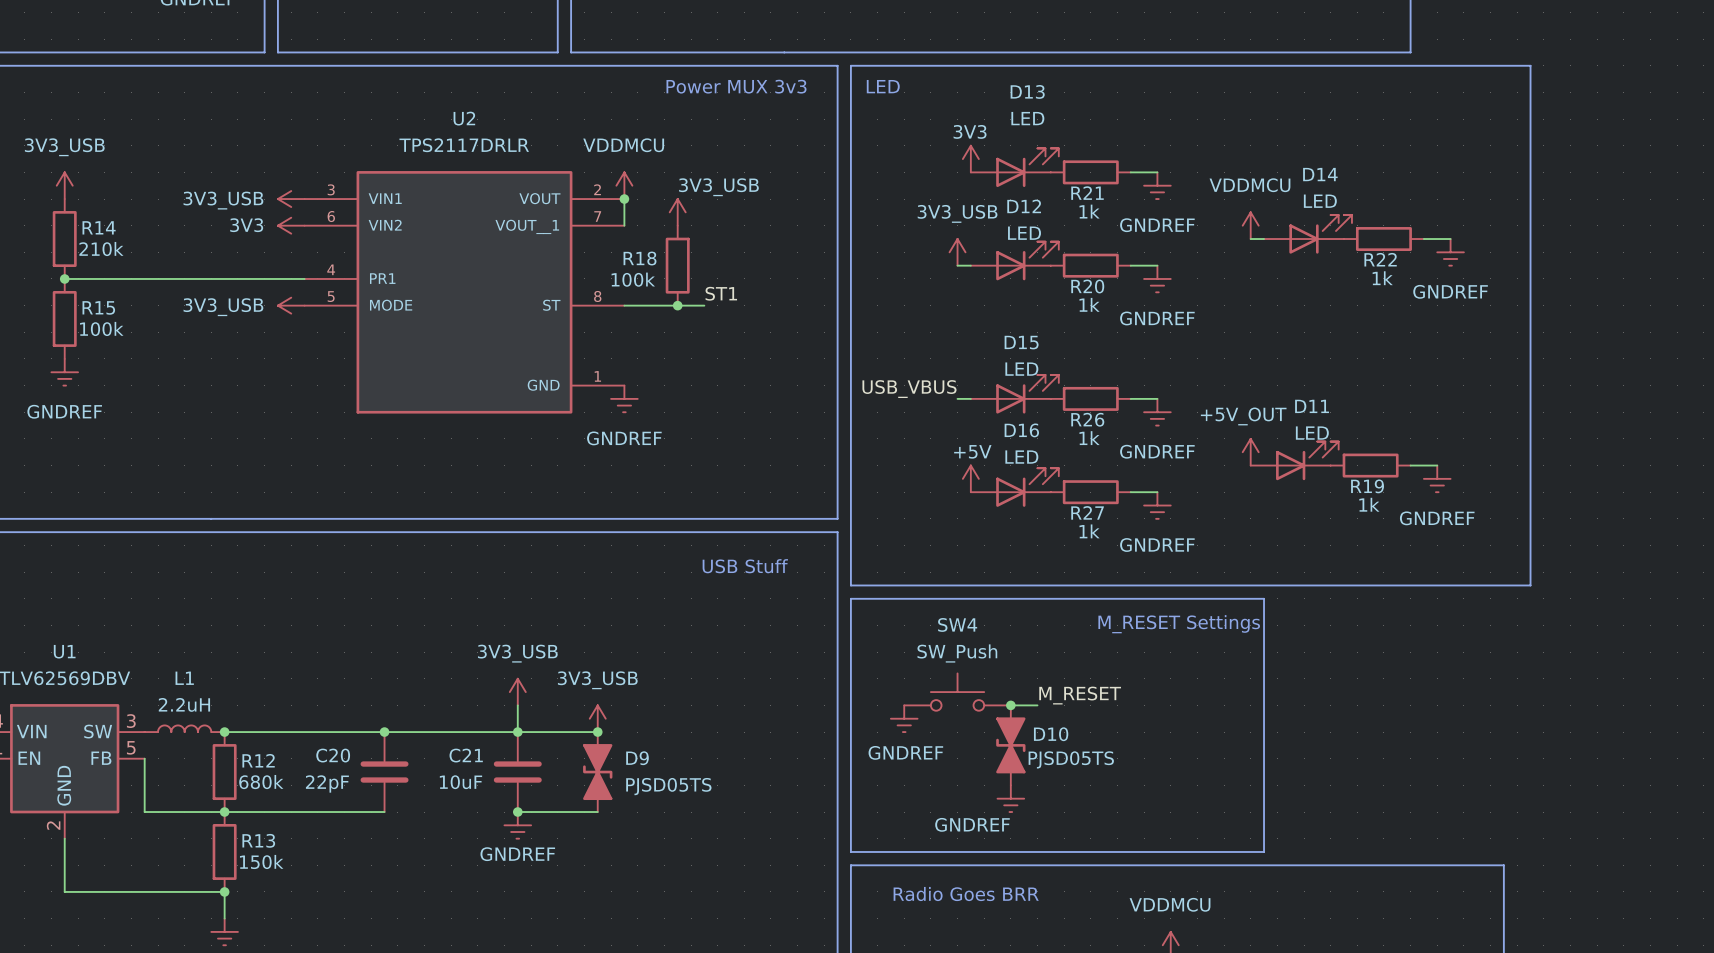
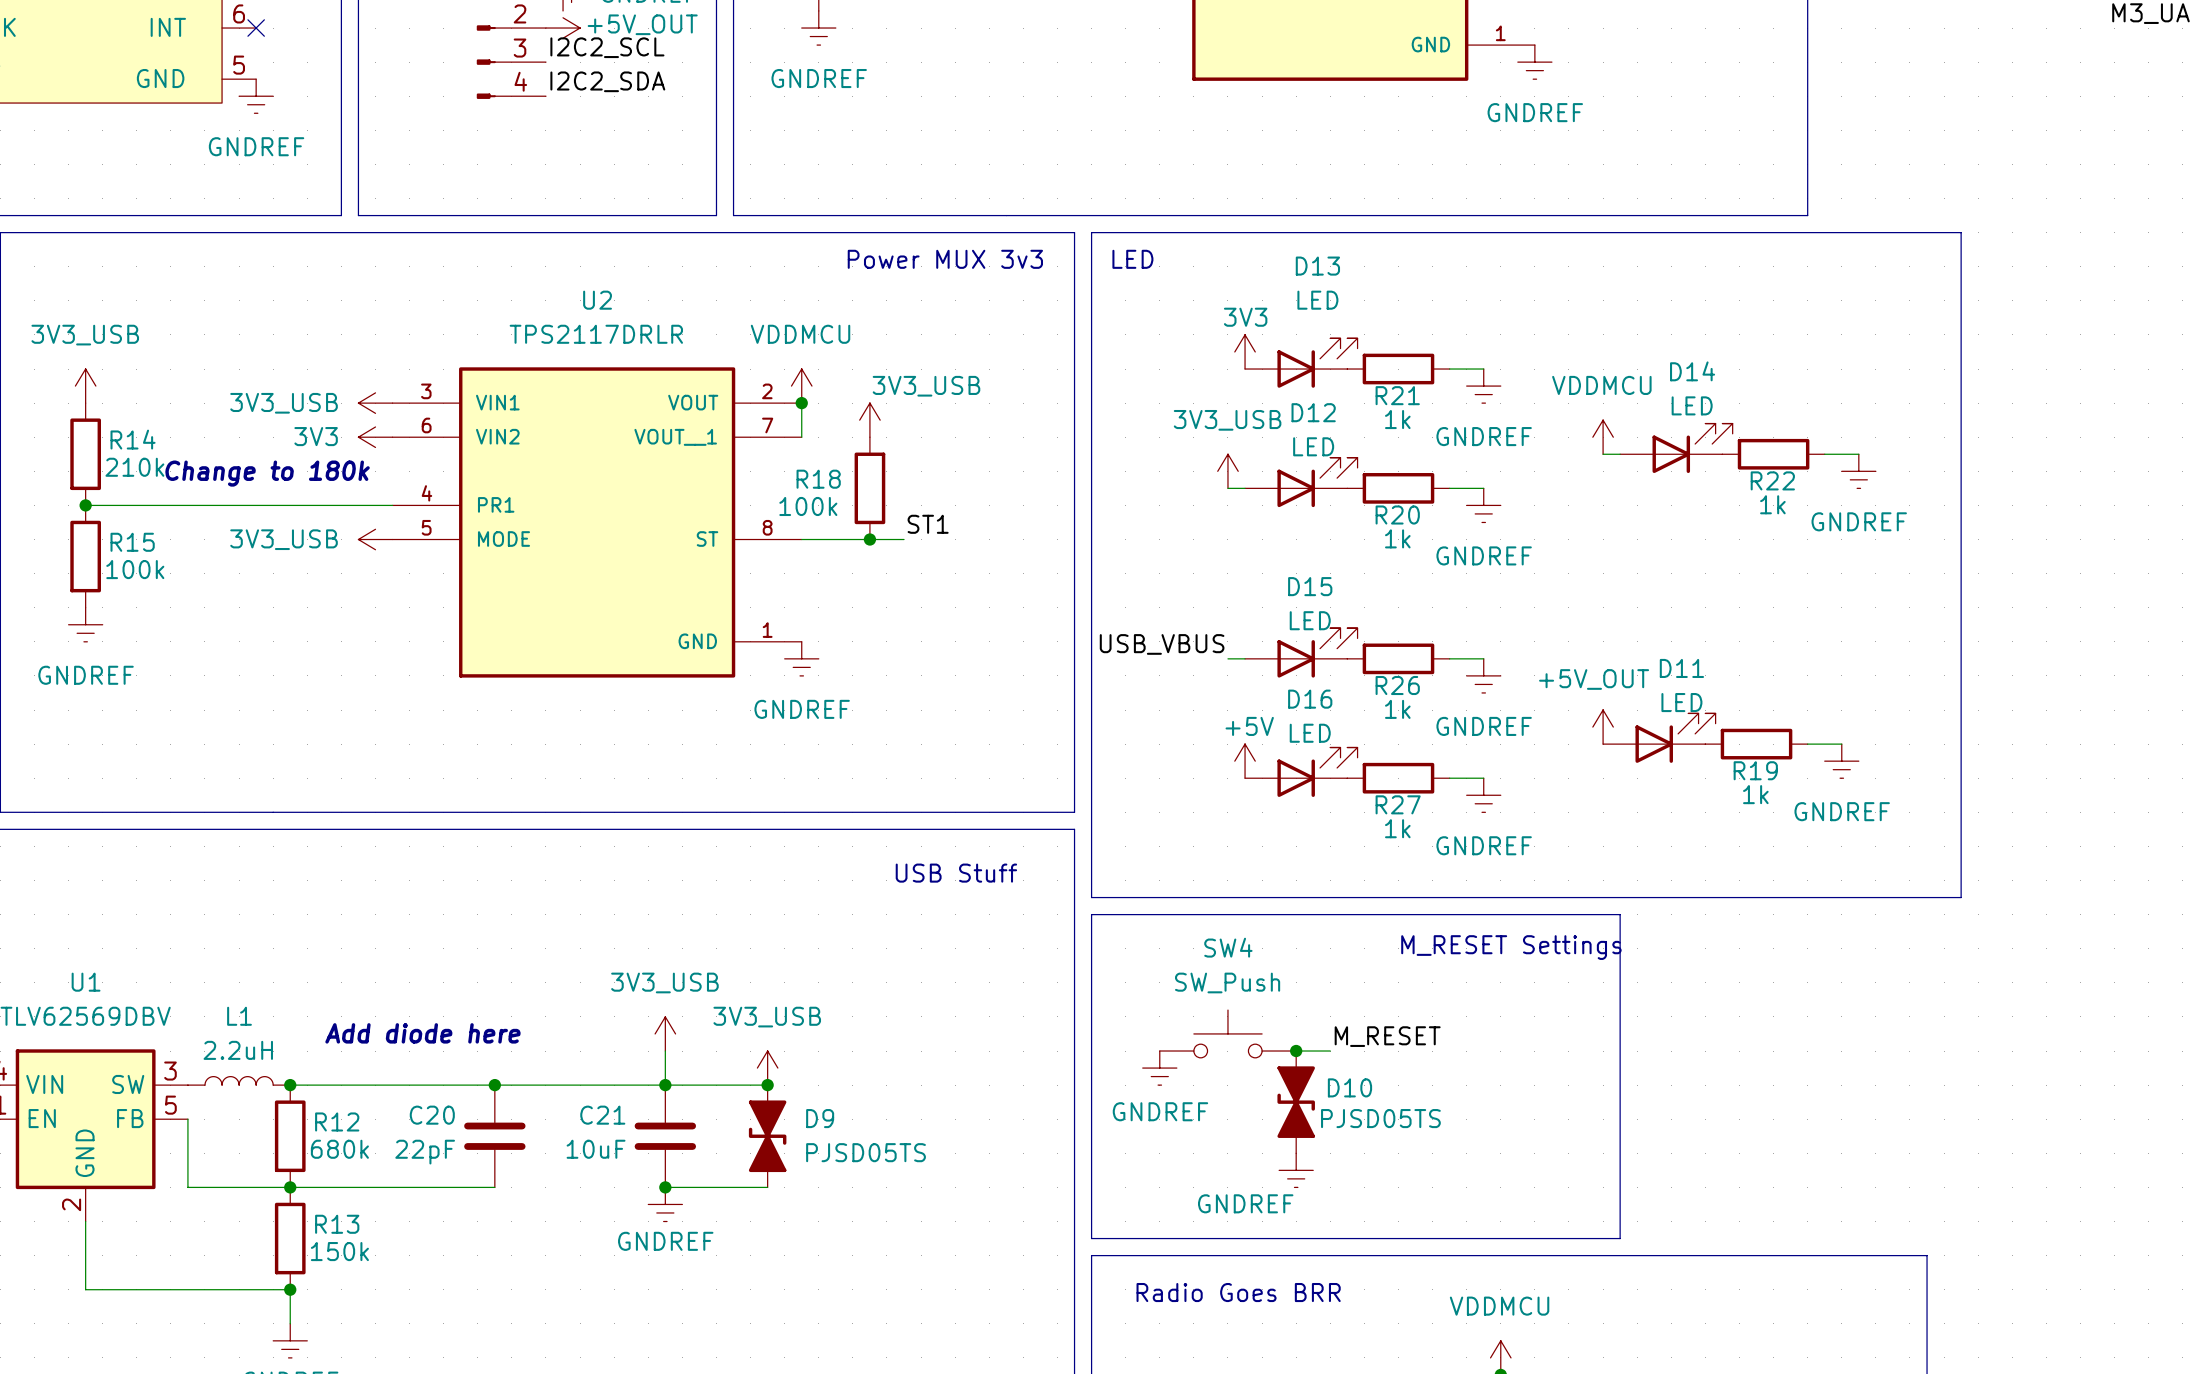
text: none -> Change to 180k (267, 473)
text: none -> Add diode here (422, 1033)

